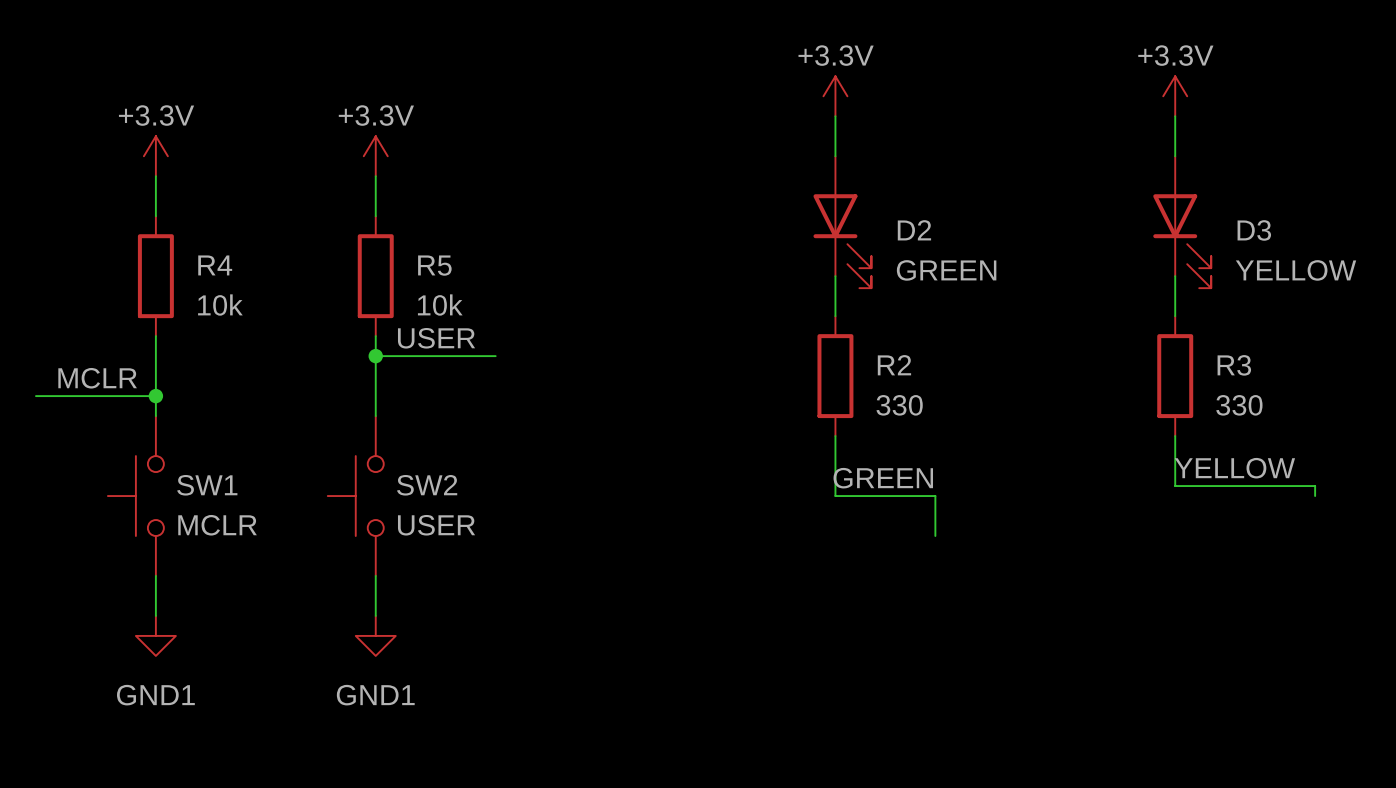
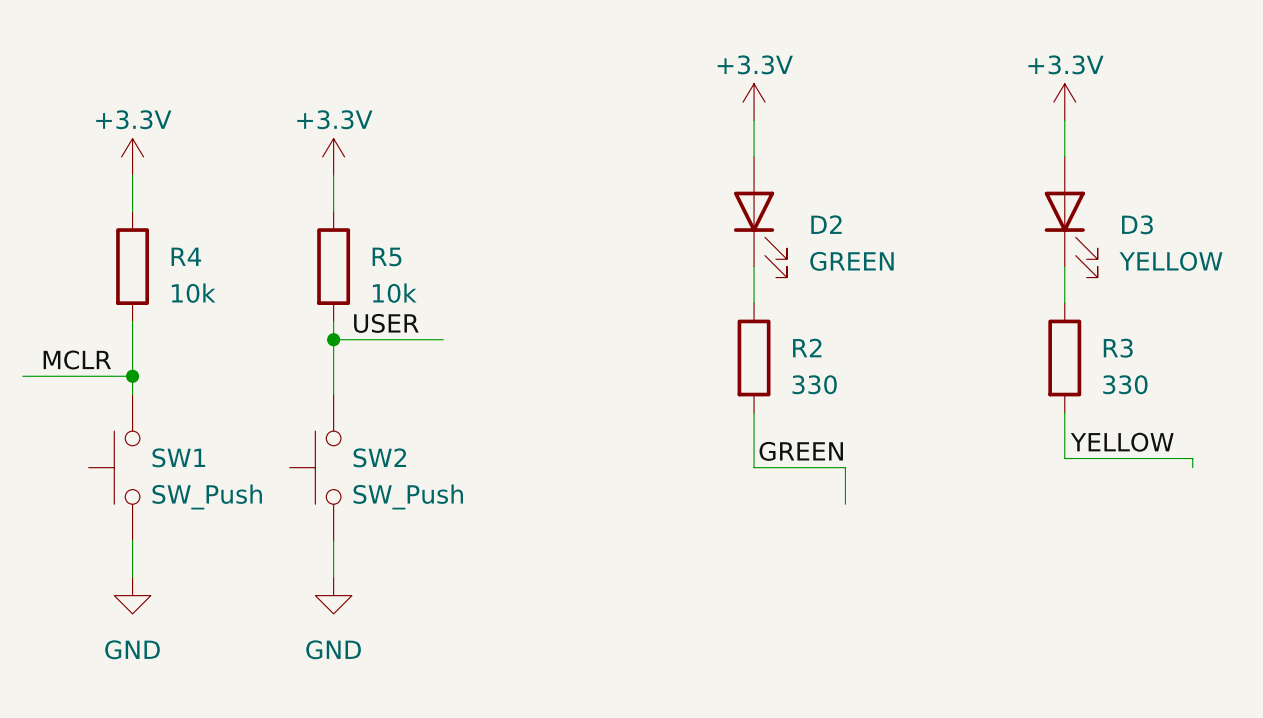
SW1 value: MCLR (217, 525) -> SW_Push (207, 496)
SW2 value: USER (436, 525) -> SW_Push (408, 496)
power symbol: GND1 (155, 635) -> GND (132, 595)
power symbol: GND1 (375, 635) -> GND (333, 595)

